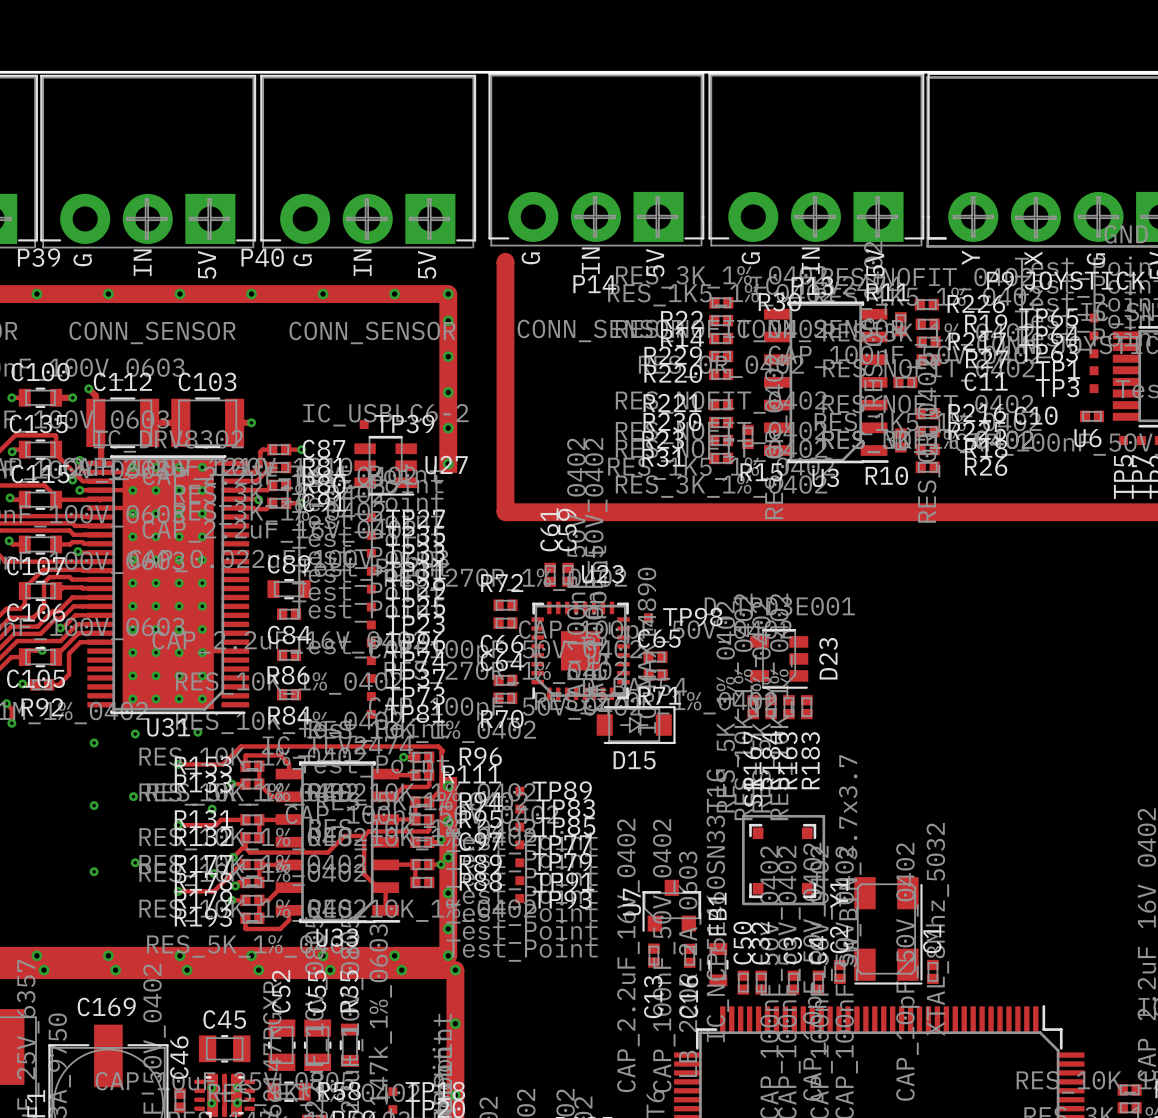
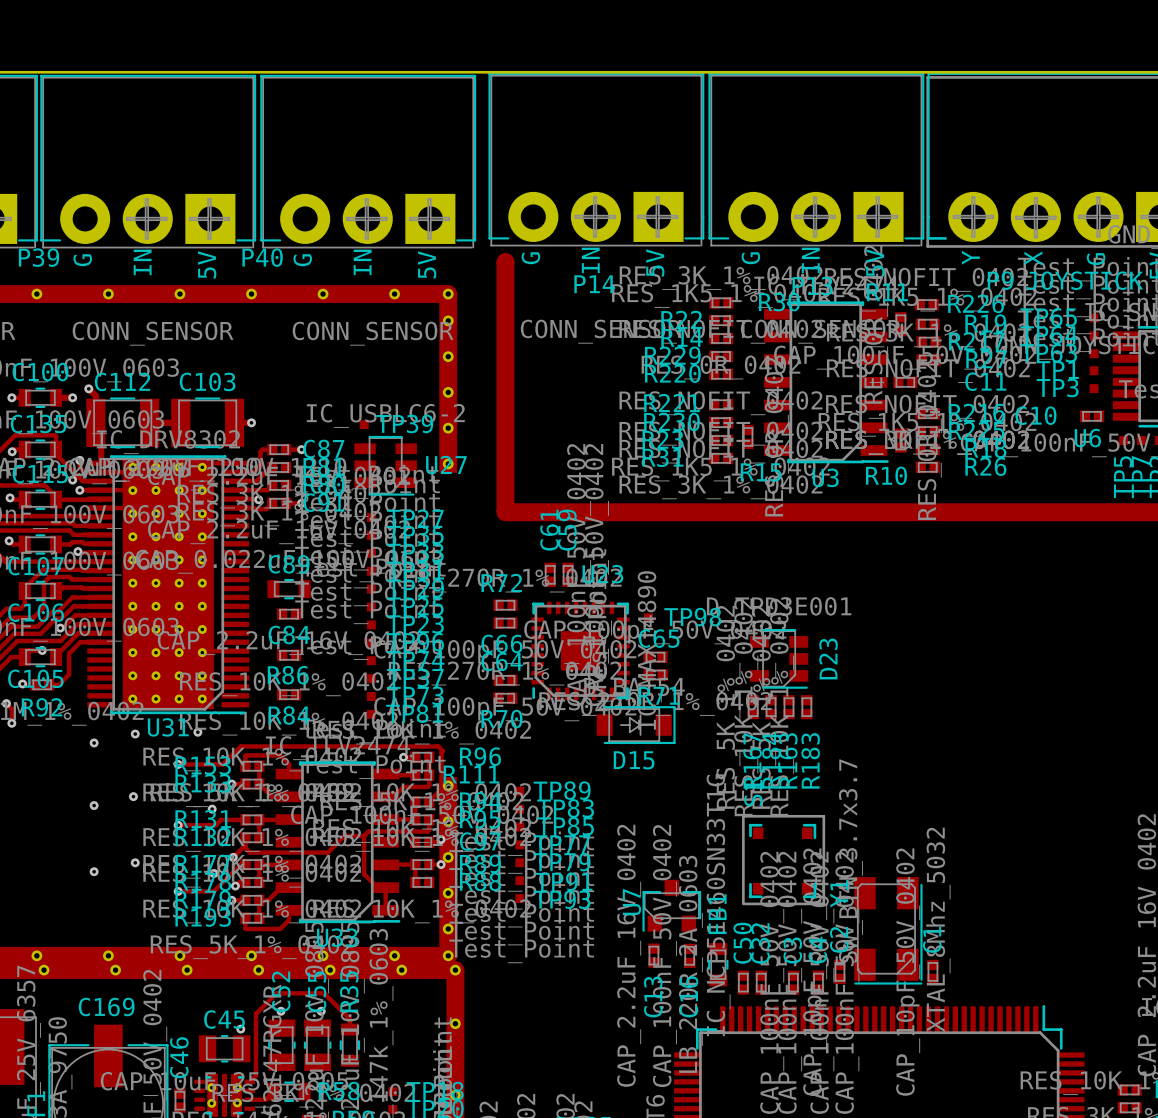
via: none -> (281, 1011)
via: none -> (321, 1011)
via: none -> (240, 1029)
track: none -> (349, 1029) (349, 1019) (324, 993) (276, 993) (255, 1013) (255, 1075) (249, 1081)
track: none -> (272, 1090) (265, 1099) (249, 1099)

